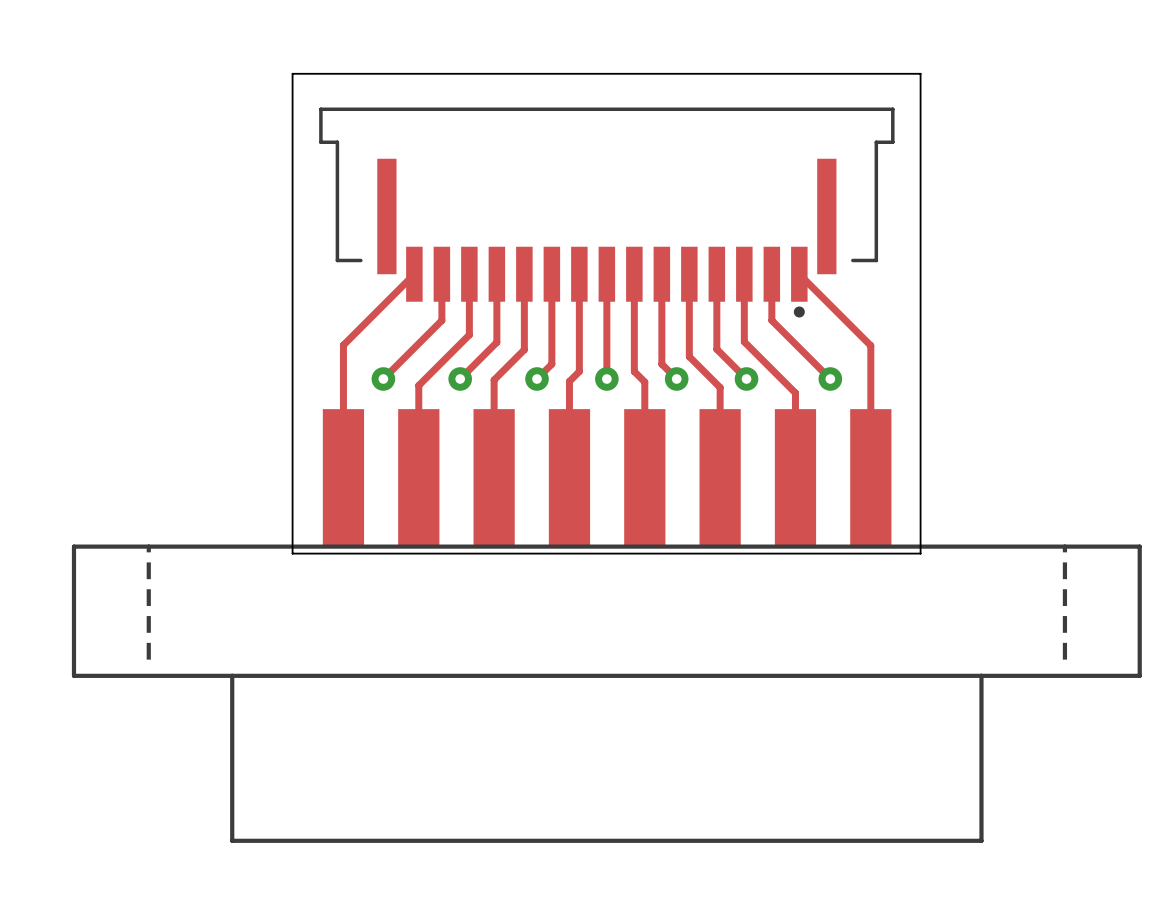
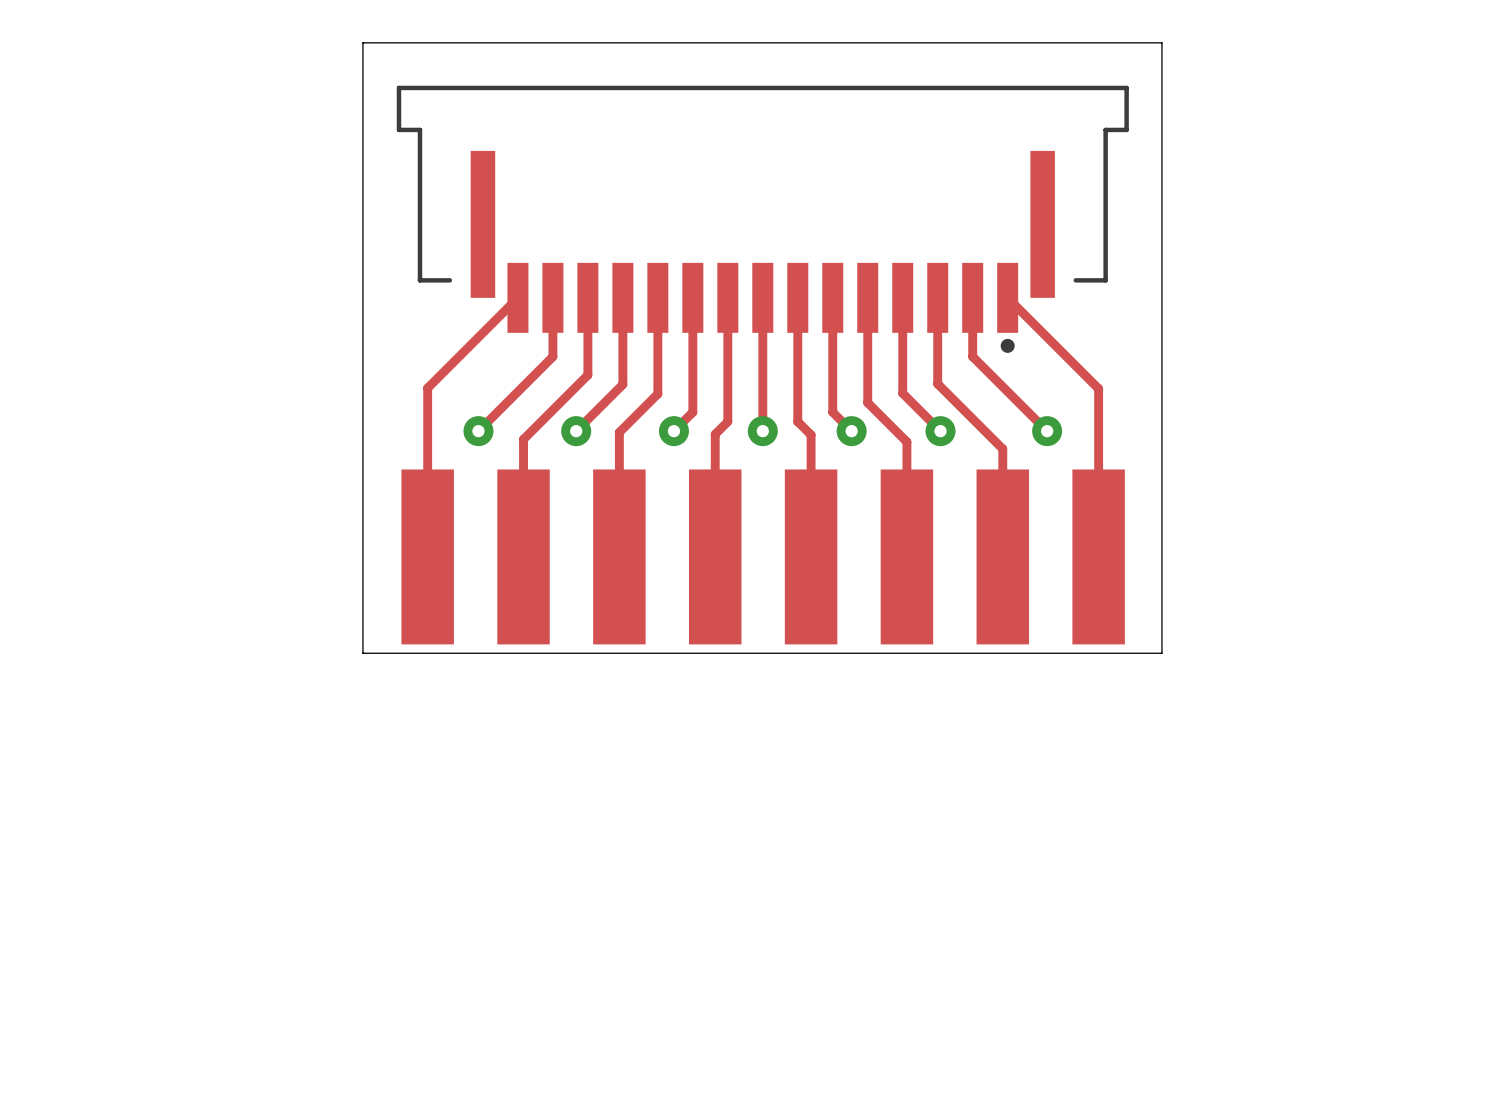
part: none -> (763, 556)
part: (606, 626) -> none

